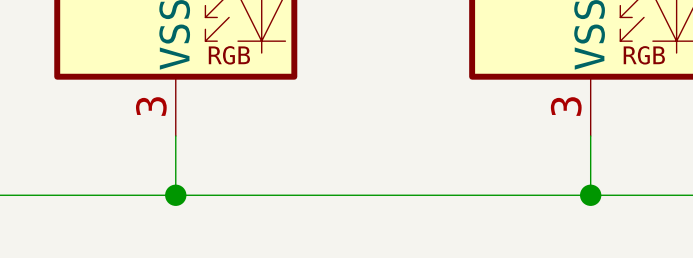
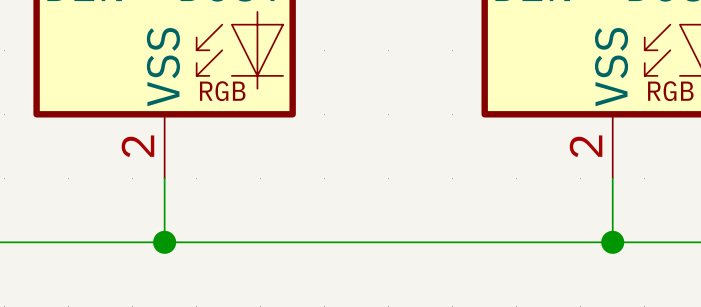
part pin number: 3 (151, 106) -> 2 (137, 146)
part pin number: 3 (566, 106) -> 2 (586, 146)

